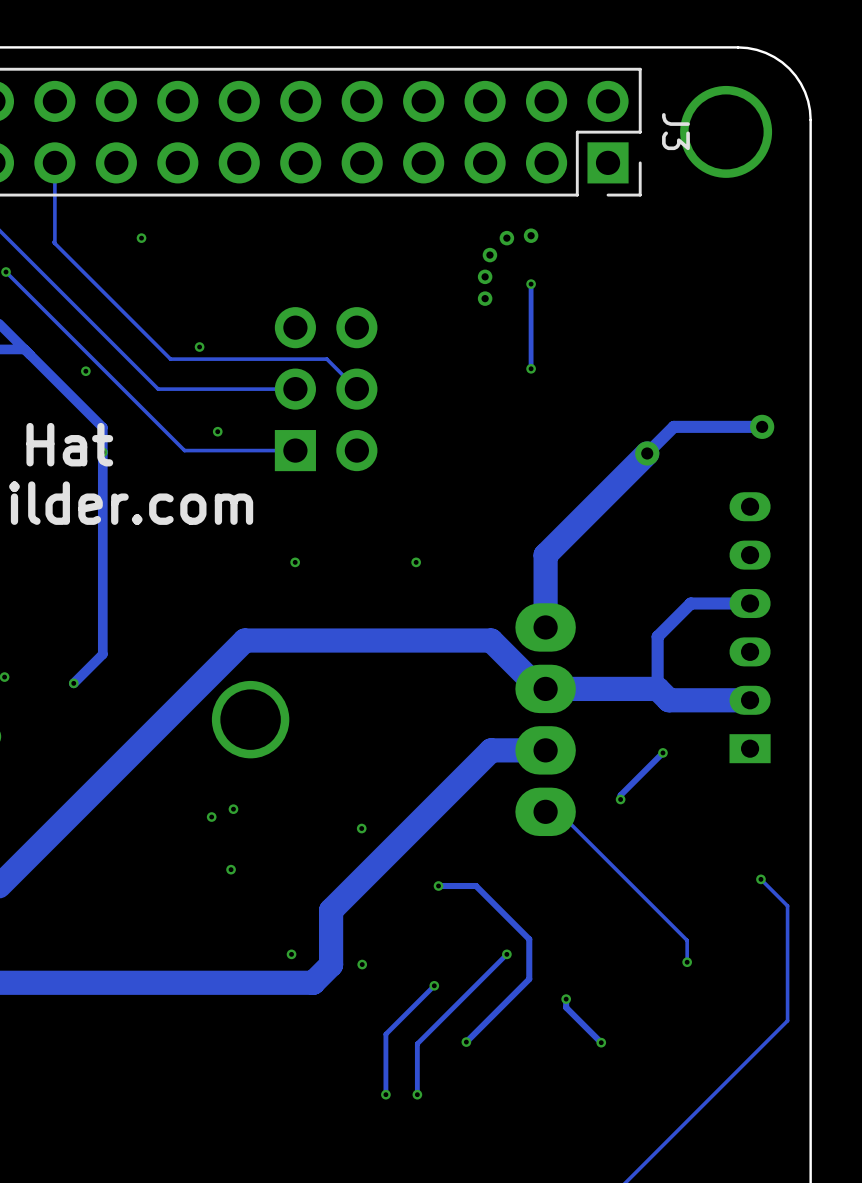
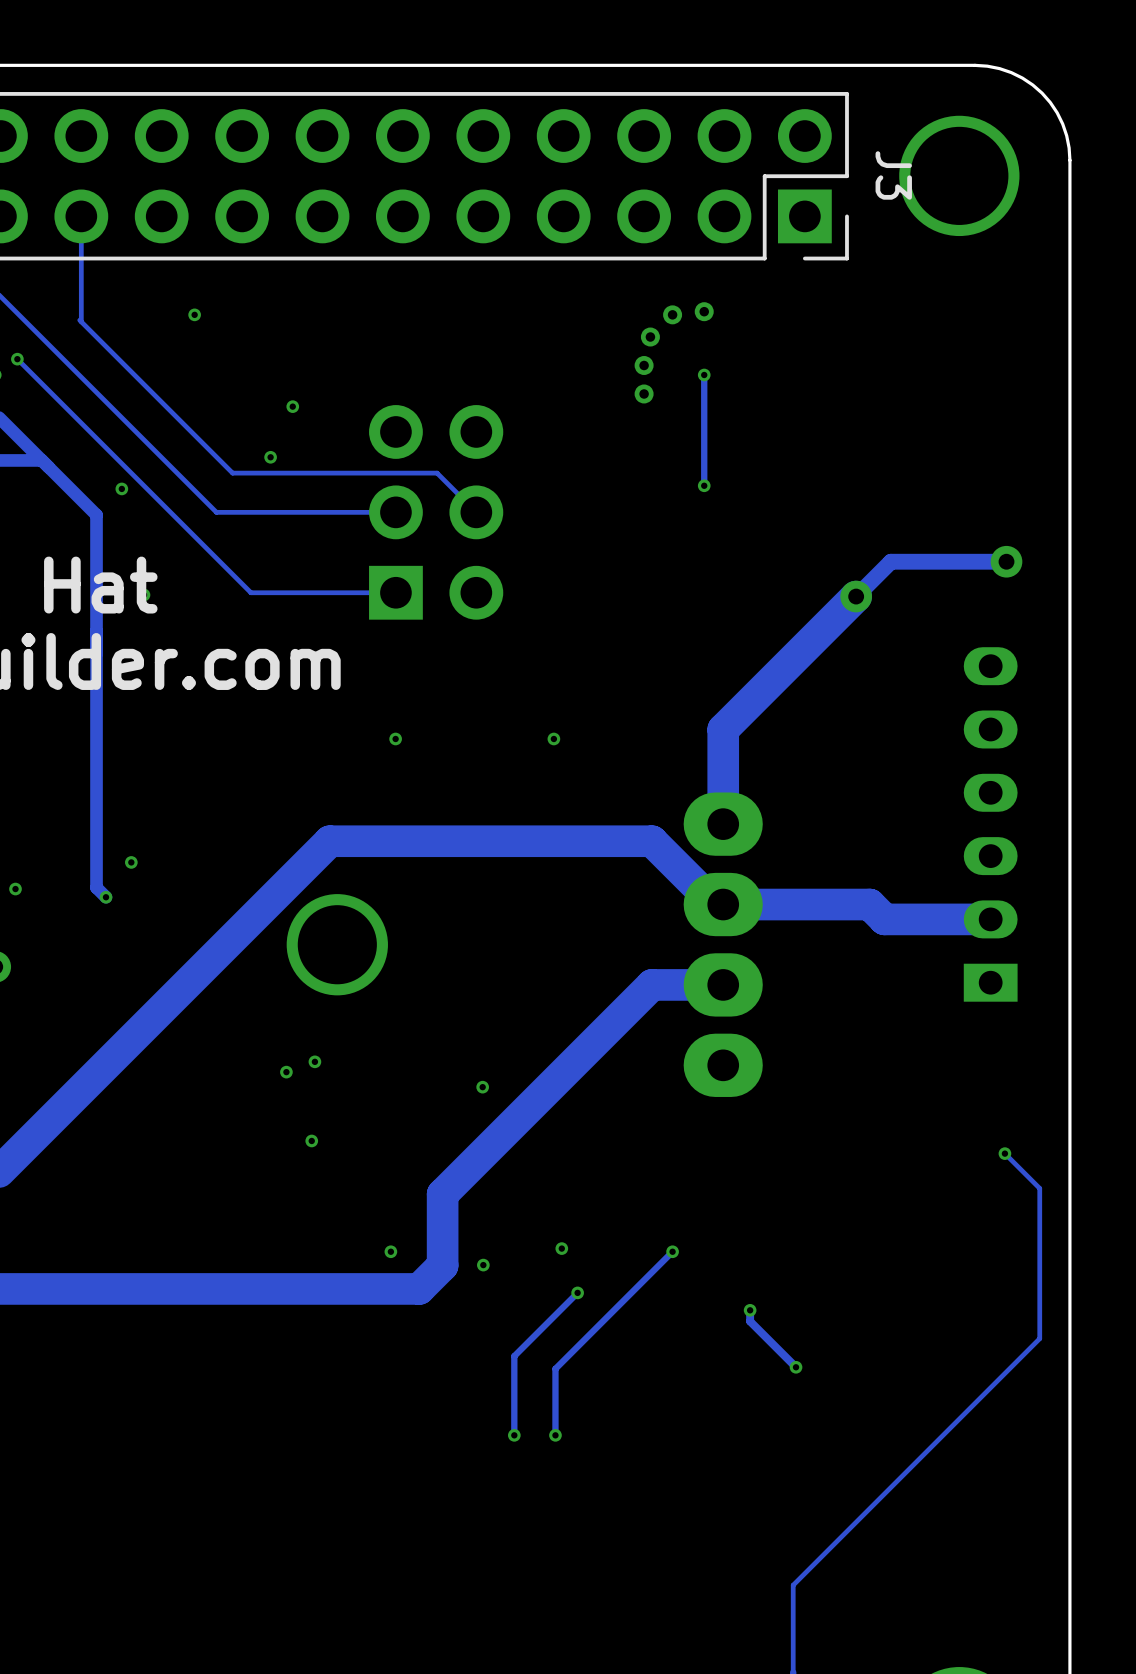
track: (66, 391) (102, 427) (102, 654) (73, 683) -> (96, 515) (96, 887) (106, 897)
via position: (217, 431) -> (292, 406)
track: (750, 603) (690, 603) (657, 636) (657, 688) -> none
via: none -> (131, 862)
track: (662, 752) (620, 795) (620, 799) -> none
via: (662, 752) -> none
via: (620, 799) -> none
track: (545, 811) (558, 811) (687, 940) (687, 962) -> none
track: (438, 886) (476, 886) (529, 939) (529, 979) (466, 1042) -> none
via: (438, 886) -> none
via: none -> (561, 1248)
via: (687, 962) -> none
via: (466, 1042) -> none

